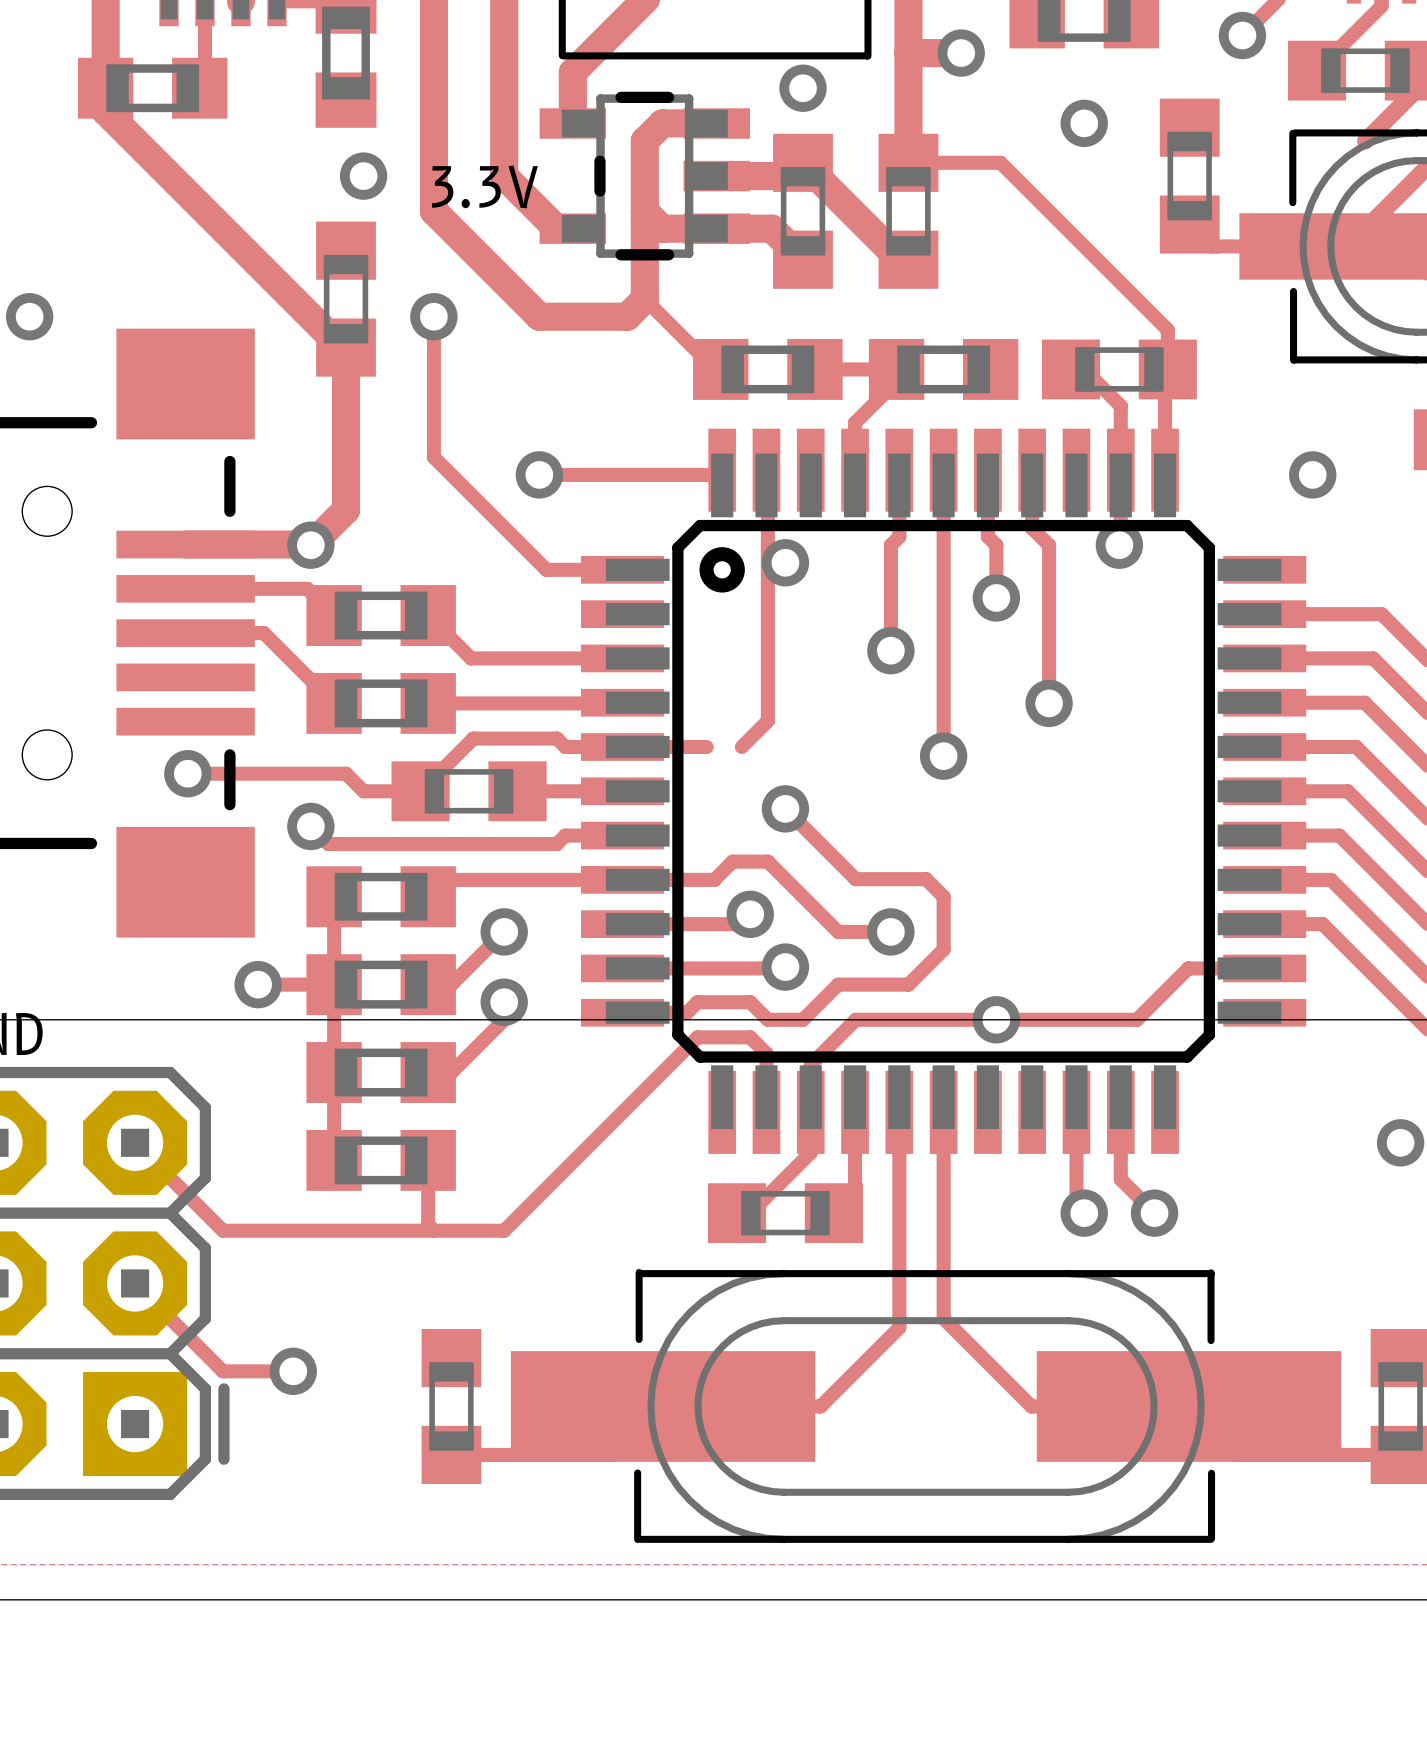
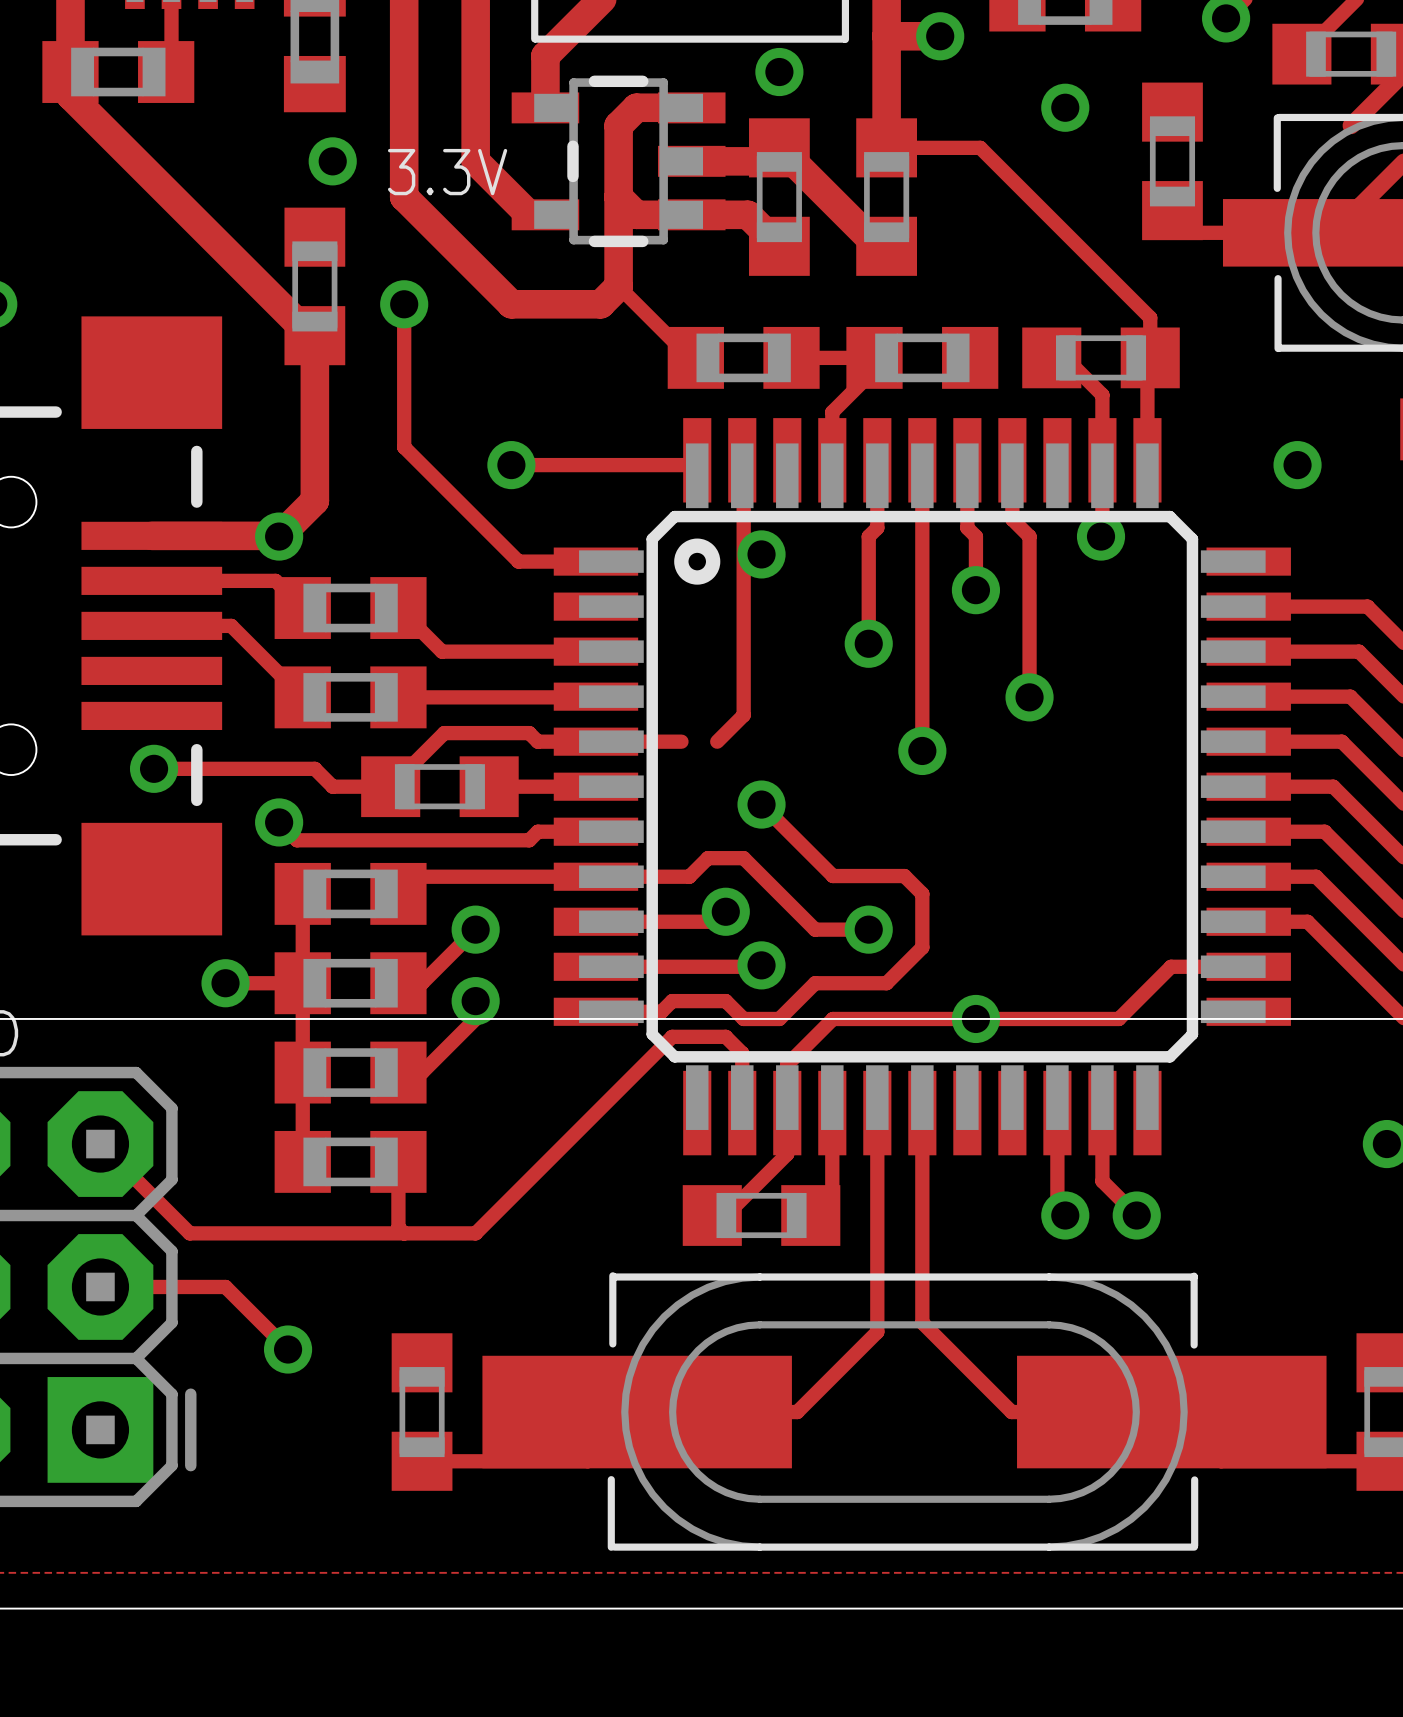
track: (135, 1283) (222, 1371) (293, 1371) -> (100, 1286) (225, 1286) (288, 1349)
via position: (293, 1371) -> (288, 1349)

